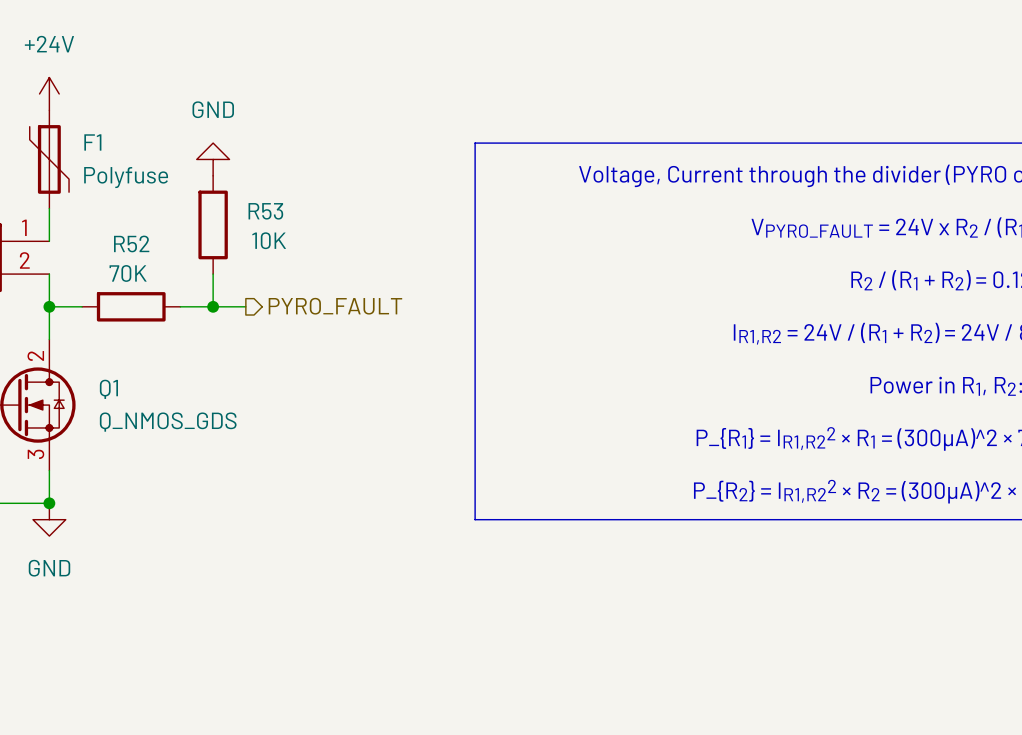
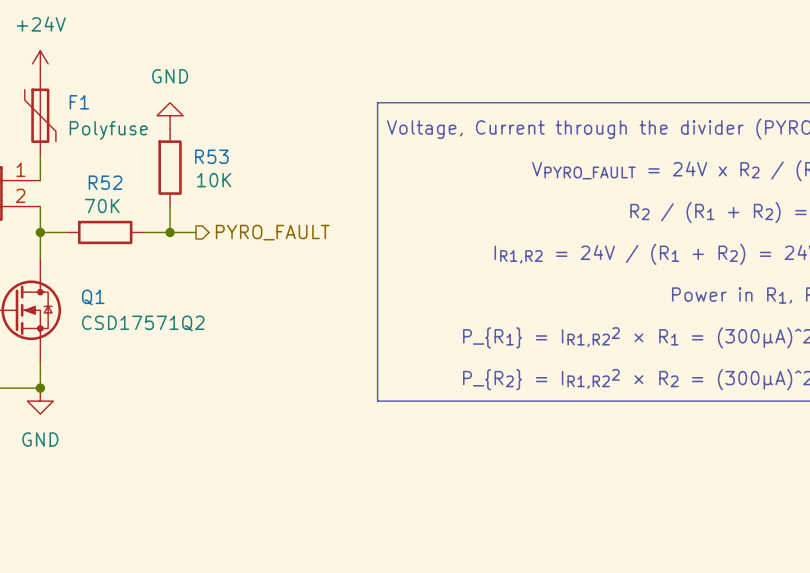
Q1 pin number: 2 (35, 355) -> none
Q1 value: Q_NMOS_GDS (168, 422) -> CSD17571Q2 (143, 323)
Q1 pin number: 3 (35, 454) -> none

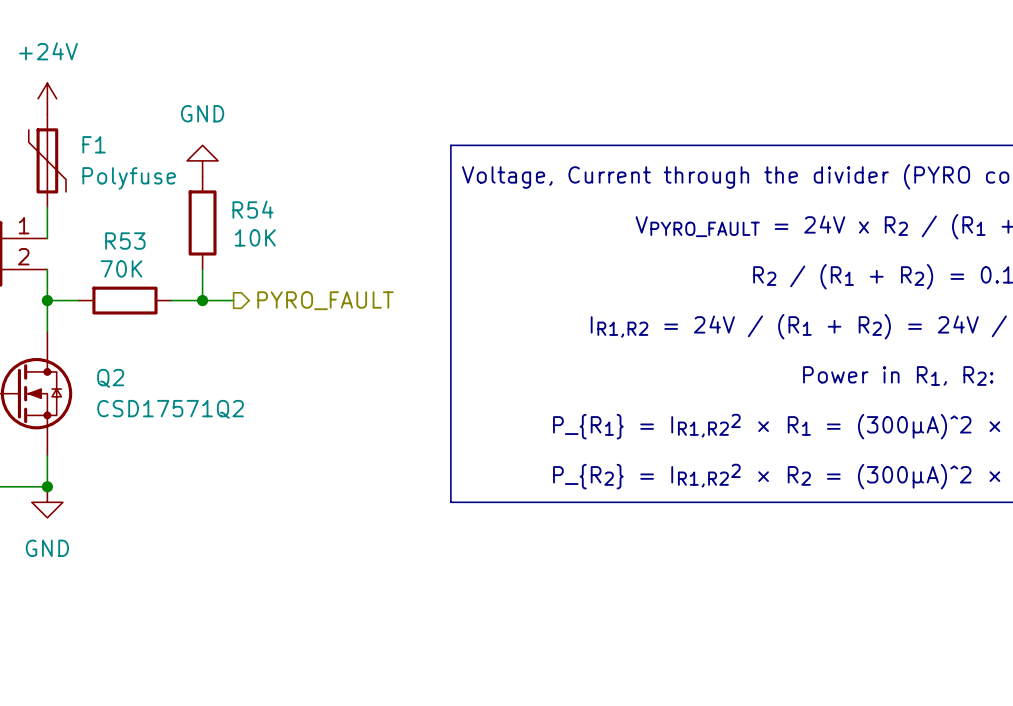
R53 name: R53 (211, 156) -> R54 (252, 209)
R52 name: R52 (105, 182) -> R53 (125, 241)
Q1 name: Q1 (93, 297) -> Q2 (110, 378)

